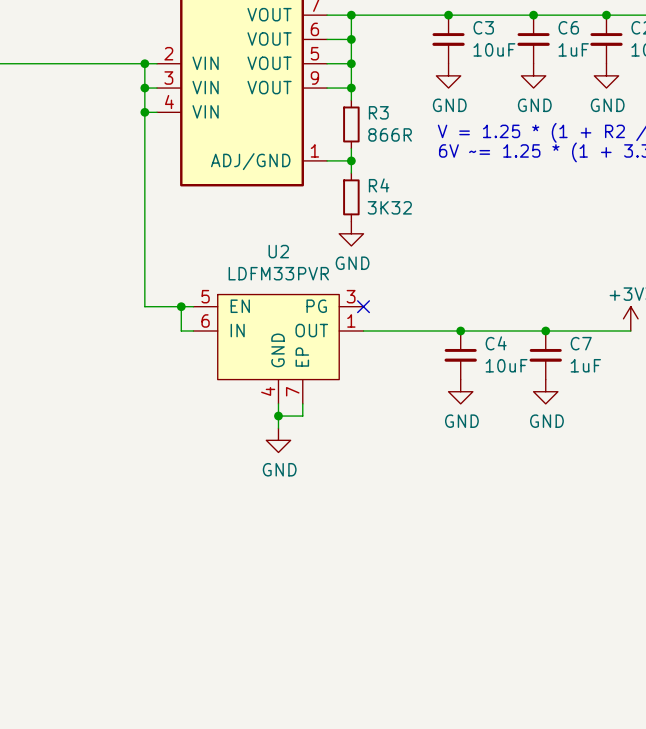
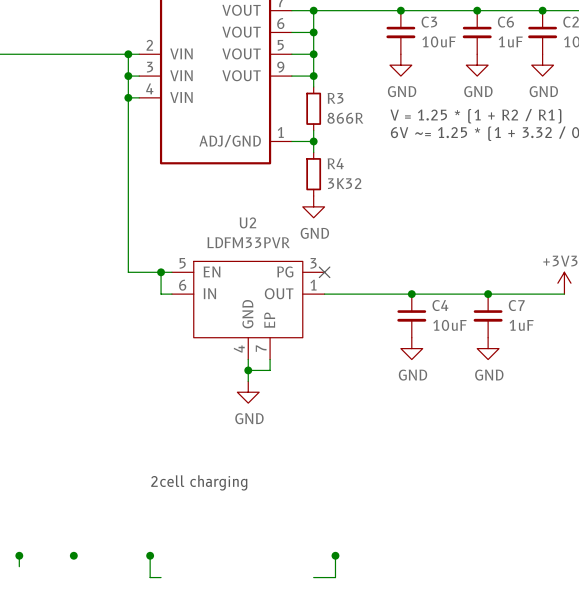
text: none -> 2cell charging (199, 482)
wire: none -> (19, 555) (19, 566)
junction: none -> (19, 555)
junction: none -> (73, 555)
wire: none -> (150, 555) (150, 577) (161, 577)
junction: none -> (150, 555)
wire: none -> (335, 555) (335, 577) (313, 577)
junction: none -> (335, 555)

